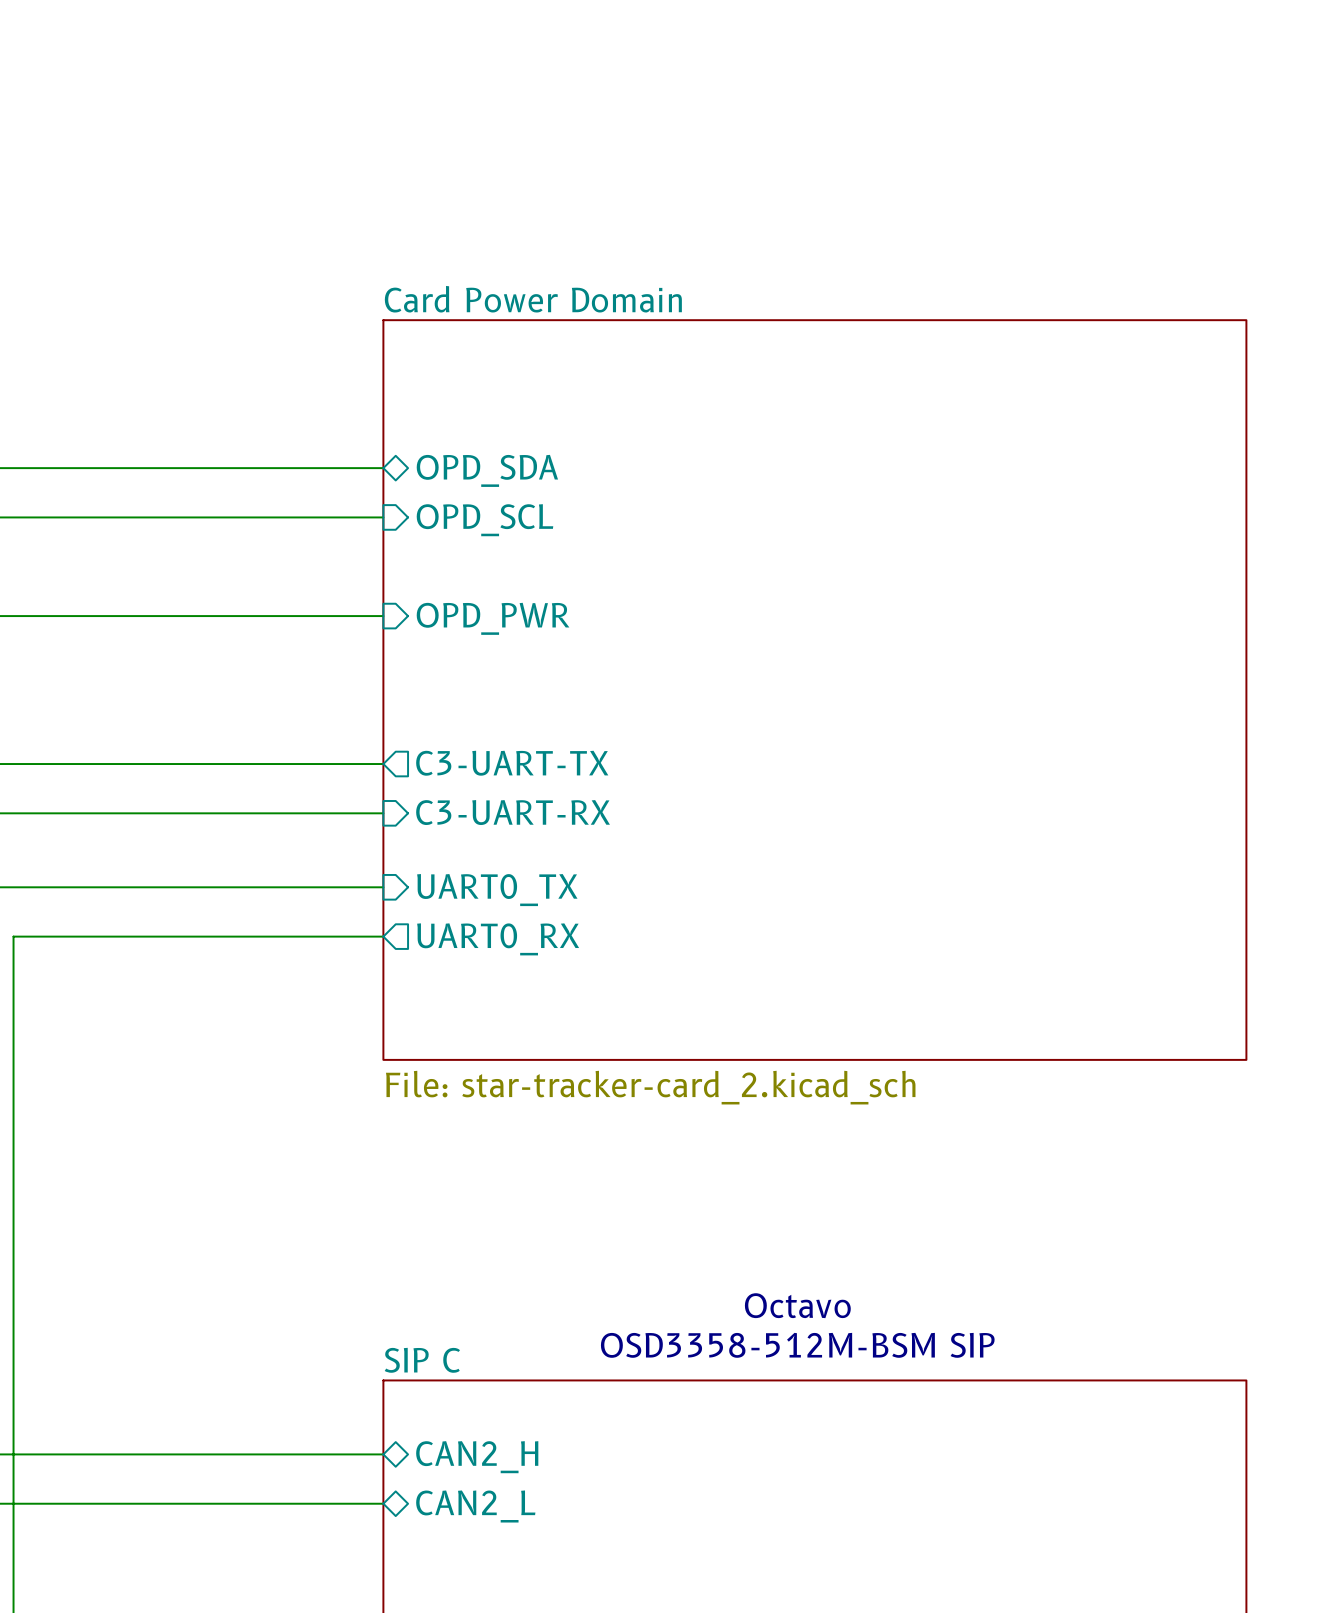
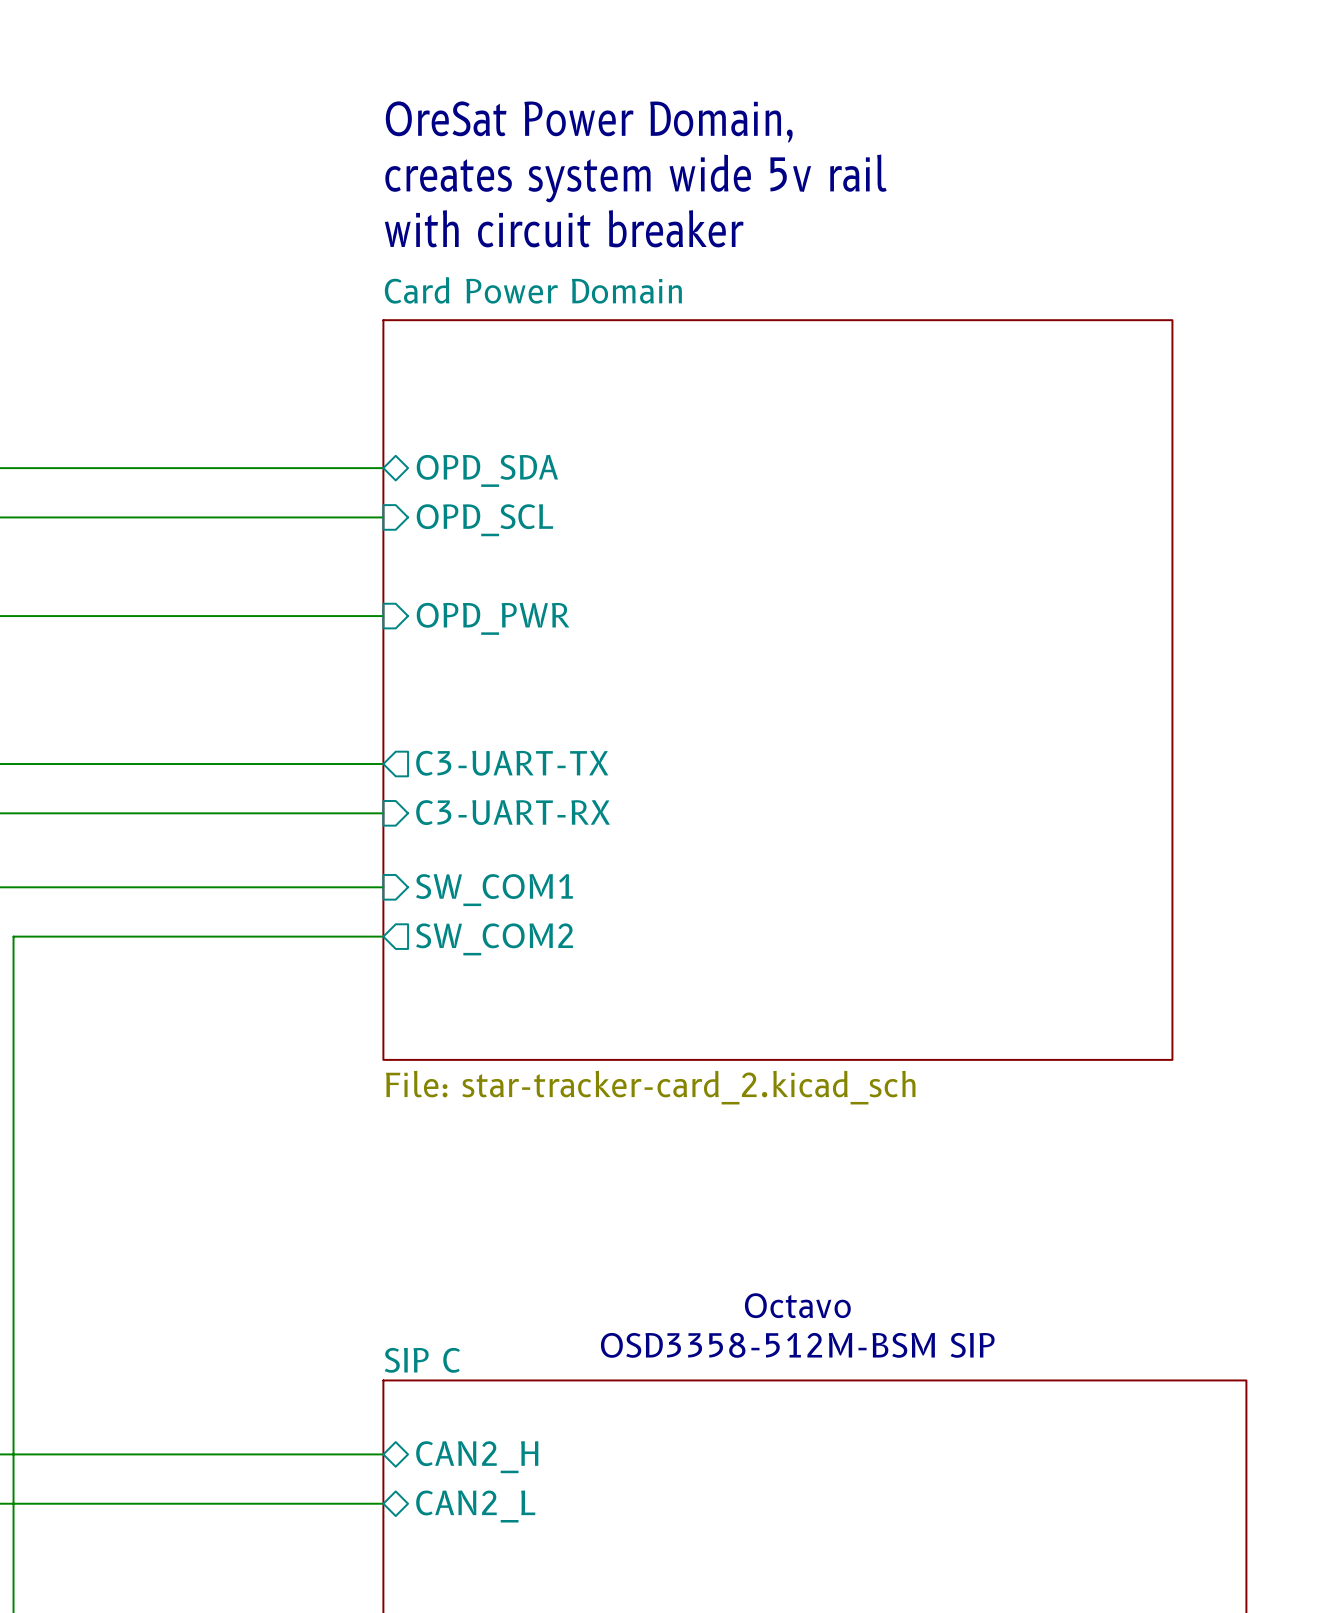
text: none -> OreSat Power Domain, (589, 122)
text: none -> creates system wide 5v rail (636, 178)
text: none -> with circuit breaker (564, 228)
sheet Card Power Domain: none -> File: star-tracker-card_2.kicad_sch (777, 690)
sheet Card Power Domain: File: star-tracker-card_2.kicad_sch (814, 690) -> none
sheet pin: UART0_TX (497, 890) -> SW_COM1 (494, 890)
sheet pin: UART0_RX (498, 939) -> SW_COM2 (494, 939)

